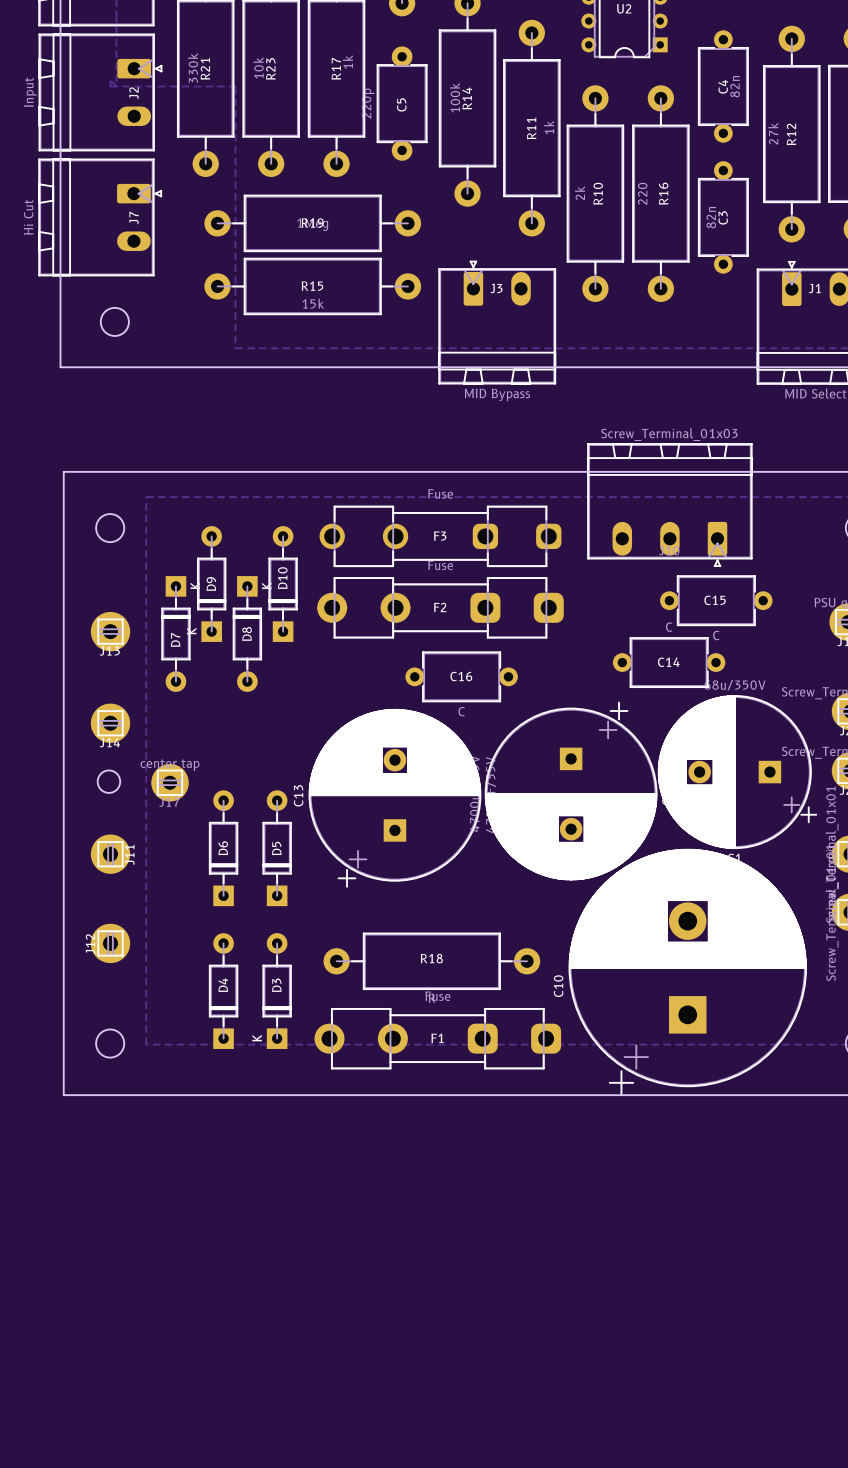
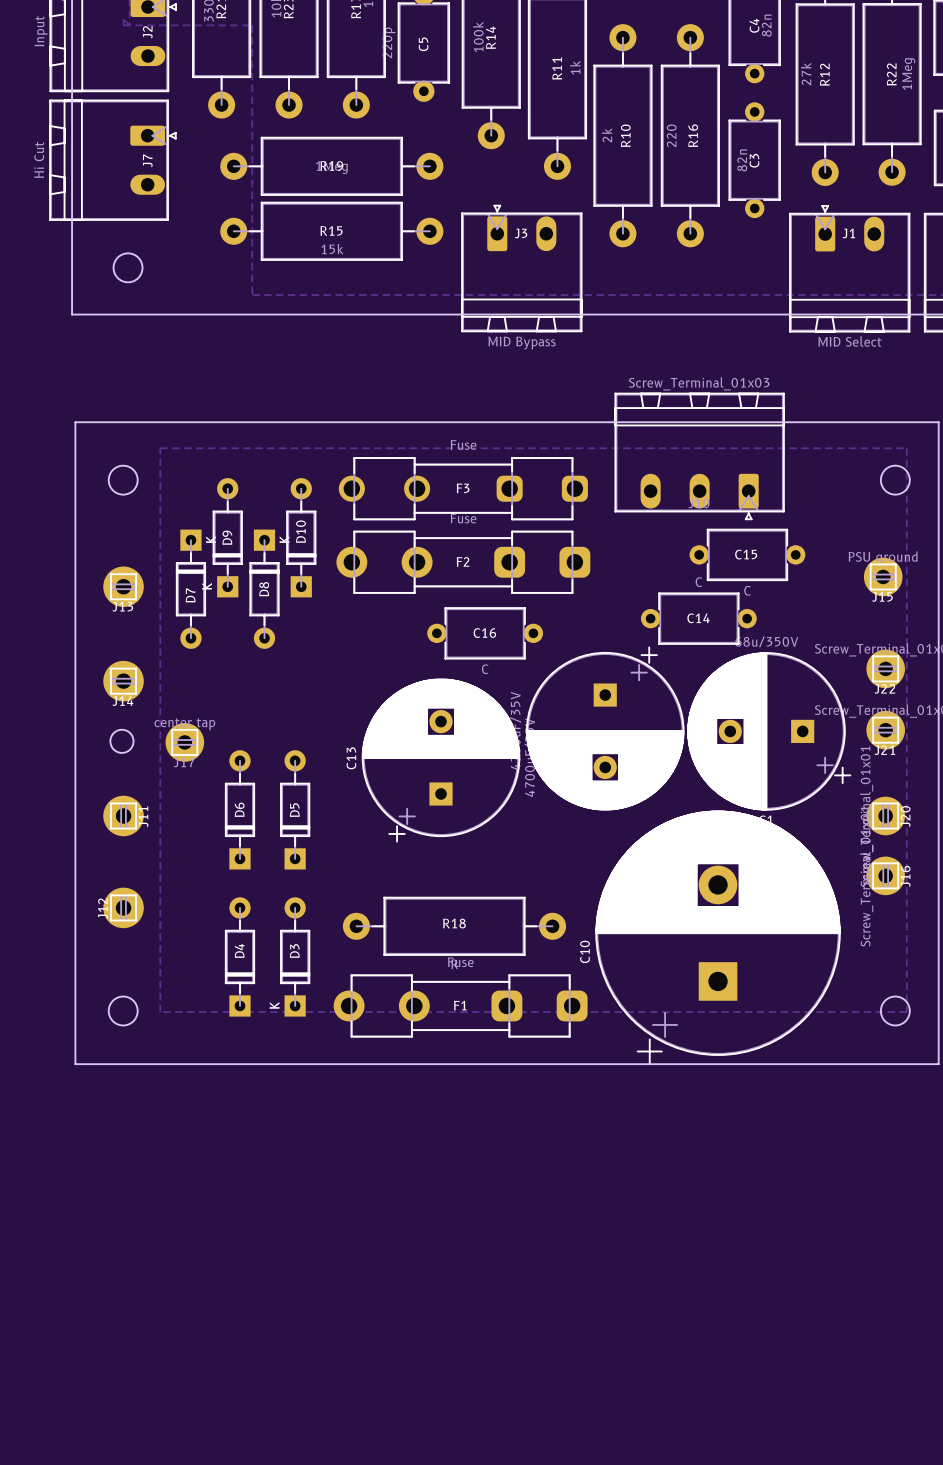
part footprint: [485, 702, 658, 881] -> [526, 646, 685, 811]
C13 footprint: [308, 709, 481, 888] -> [362, 678, 520, 843]

